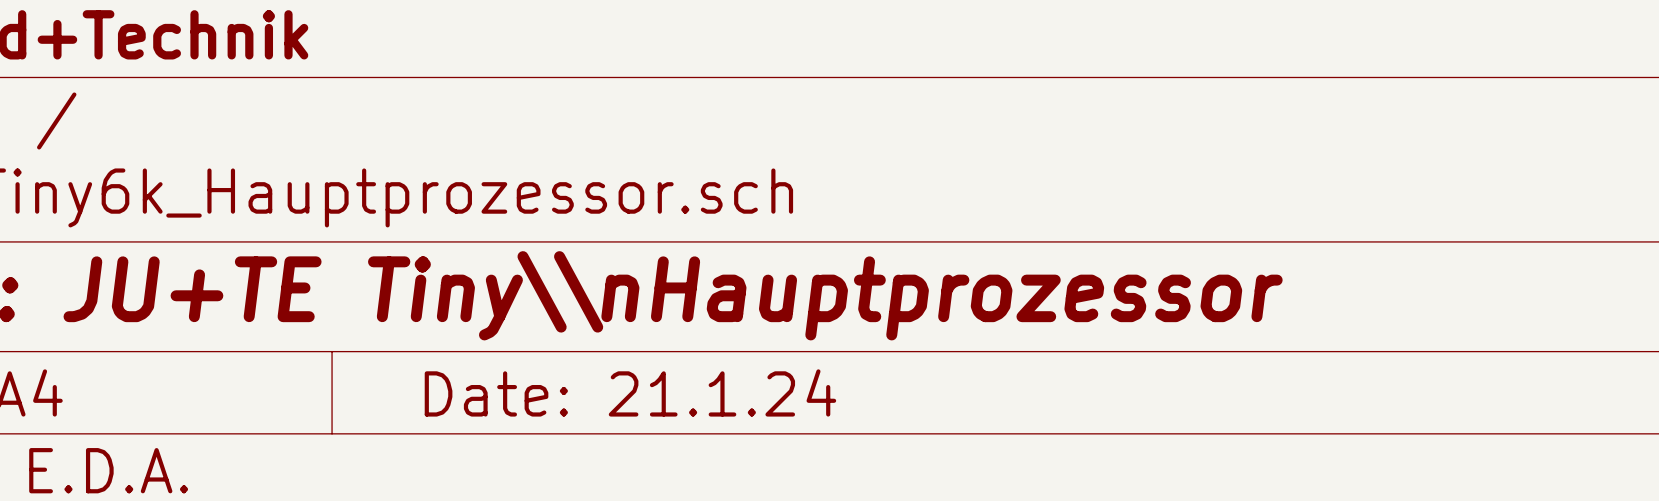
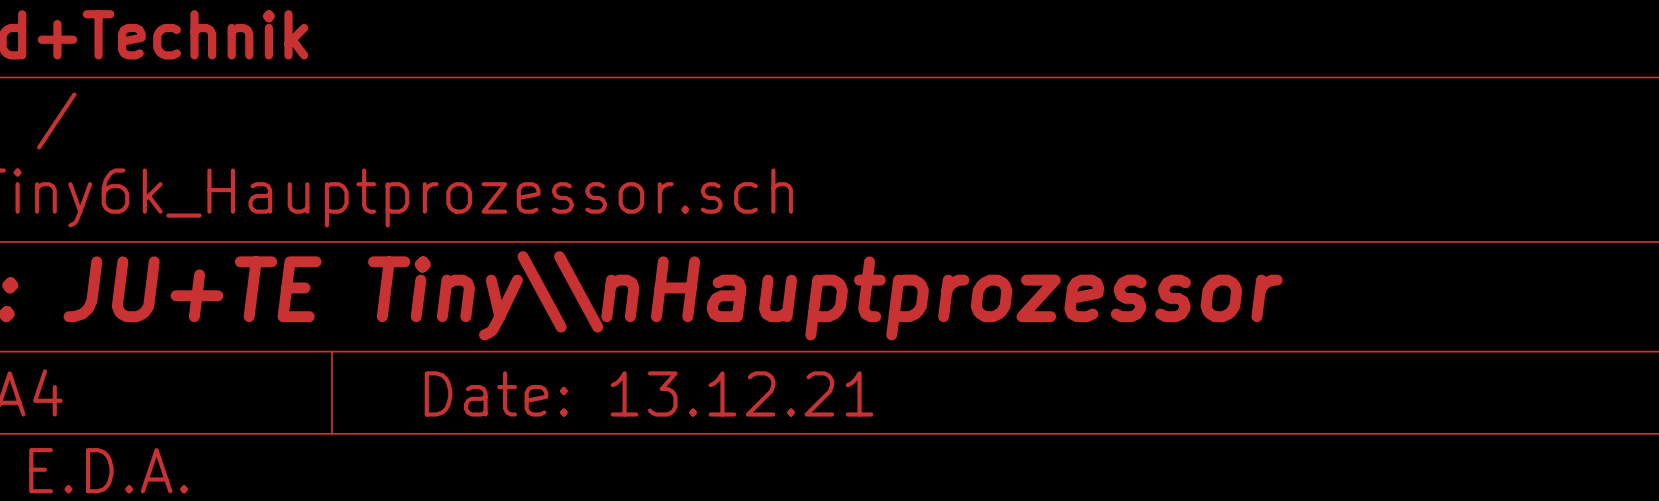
title block: Date: 21.1.24 (630, 392) -> Date: 13.12.21 (649, 393)

